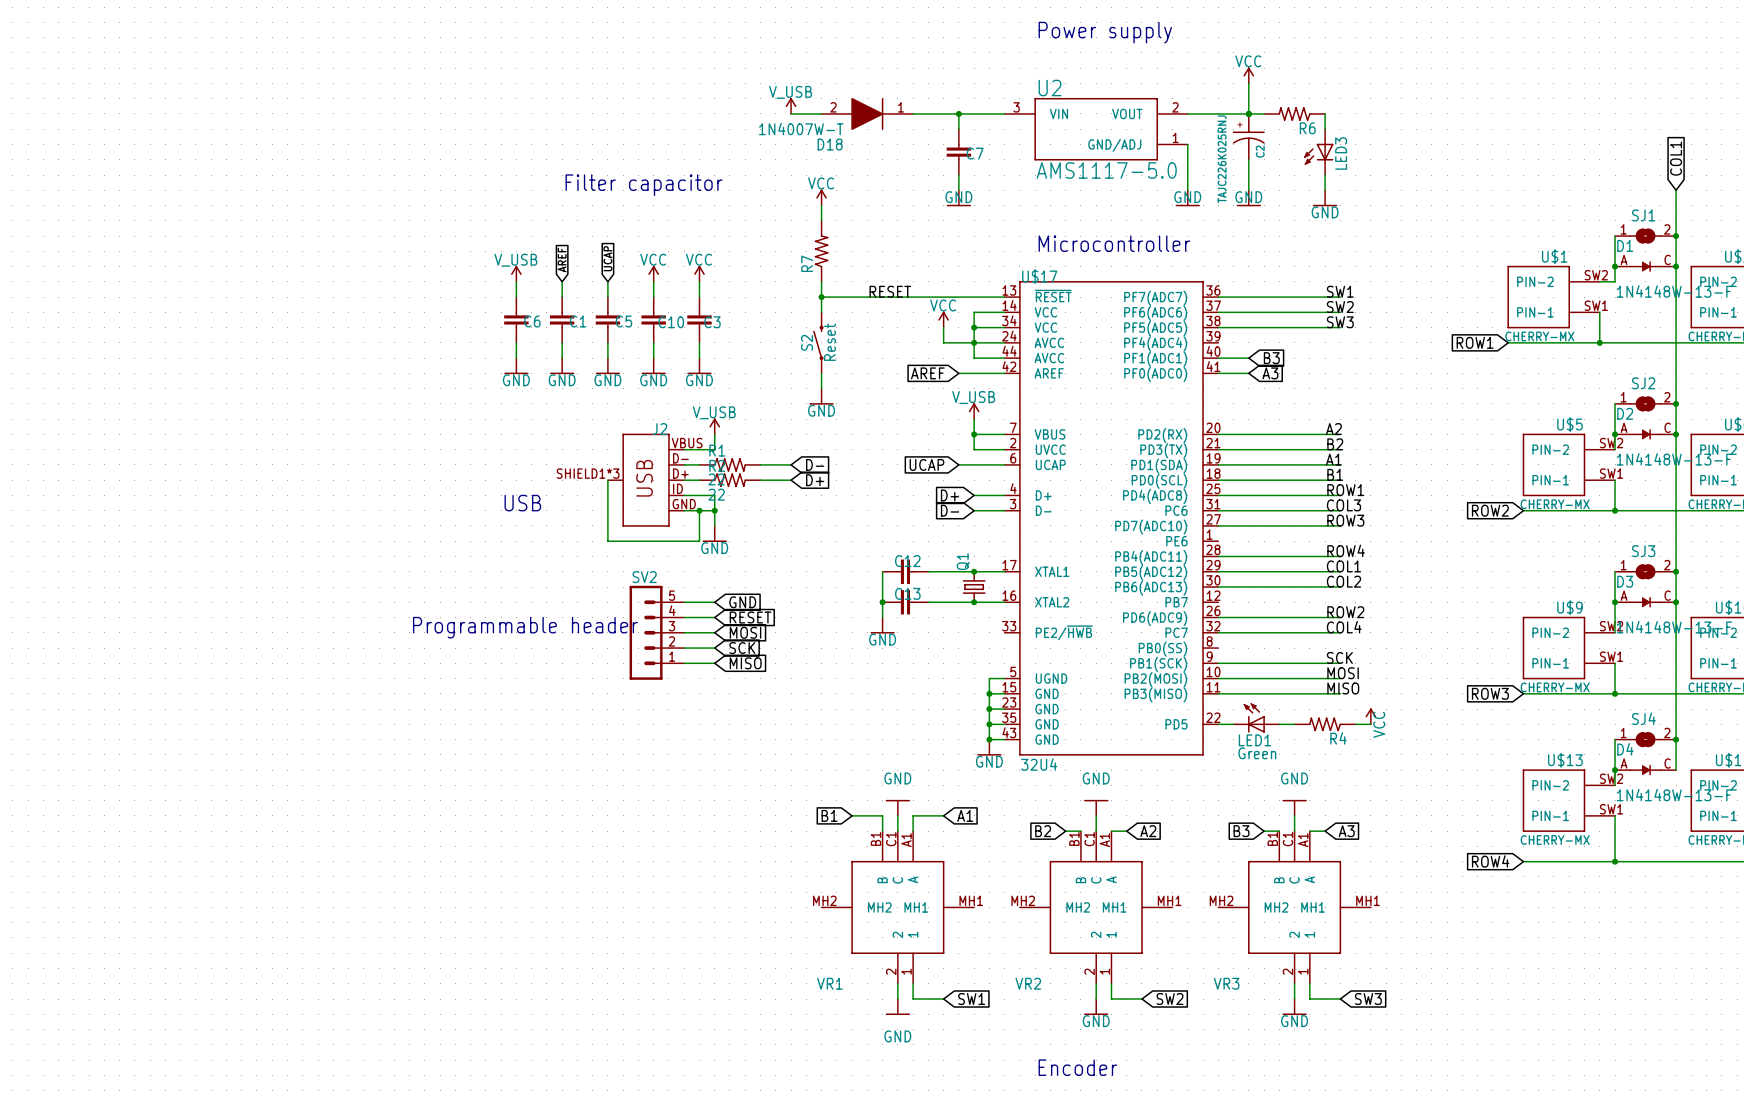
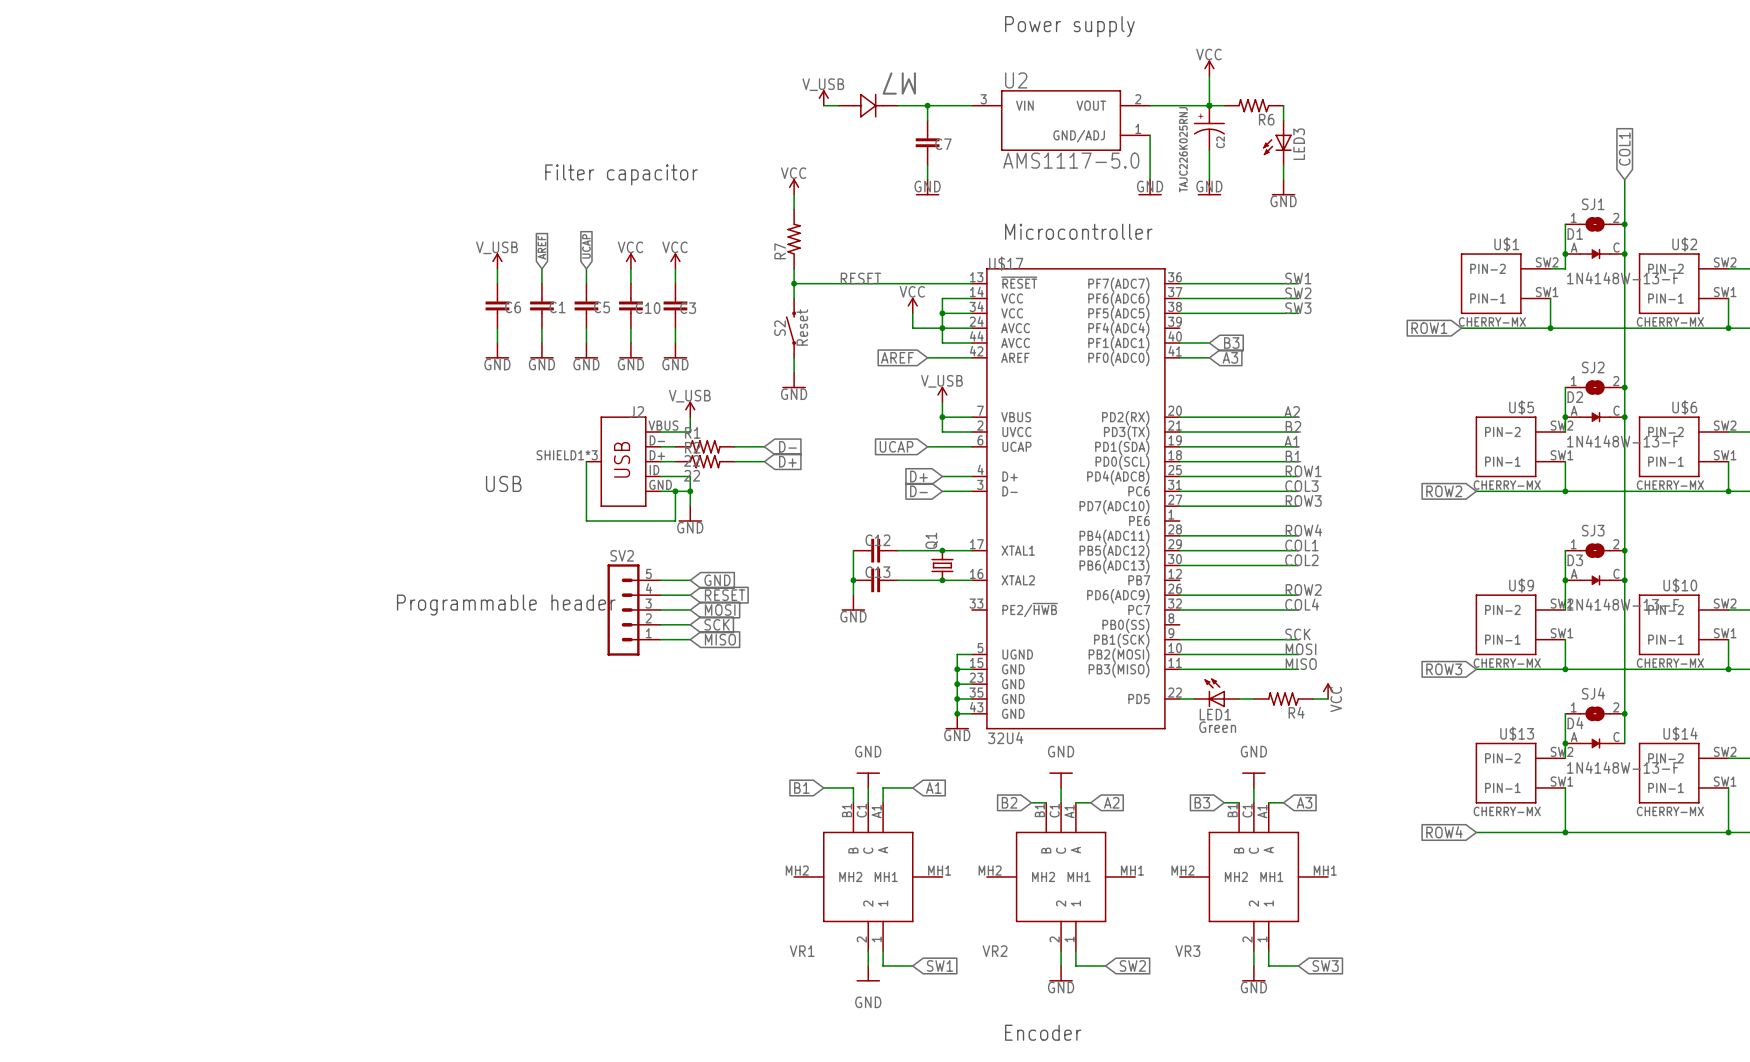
power symbol position: V_USB (791, 105) -> V_USB (823, 97)
wire: (791, 113) (821, 113) -> none
D18: 1N4007W-T (867, 113) -> none
part: none -> M7 (868, 105)

